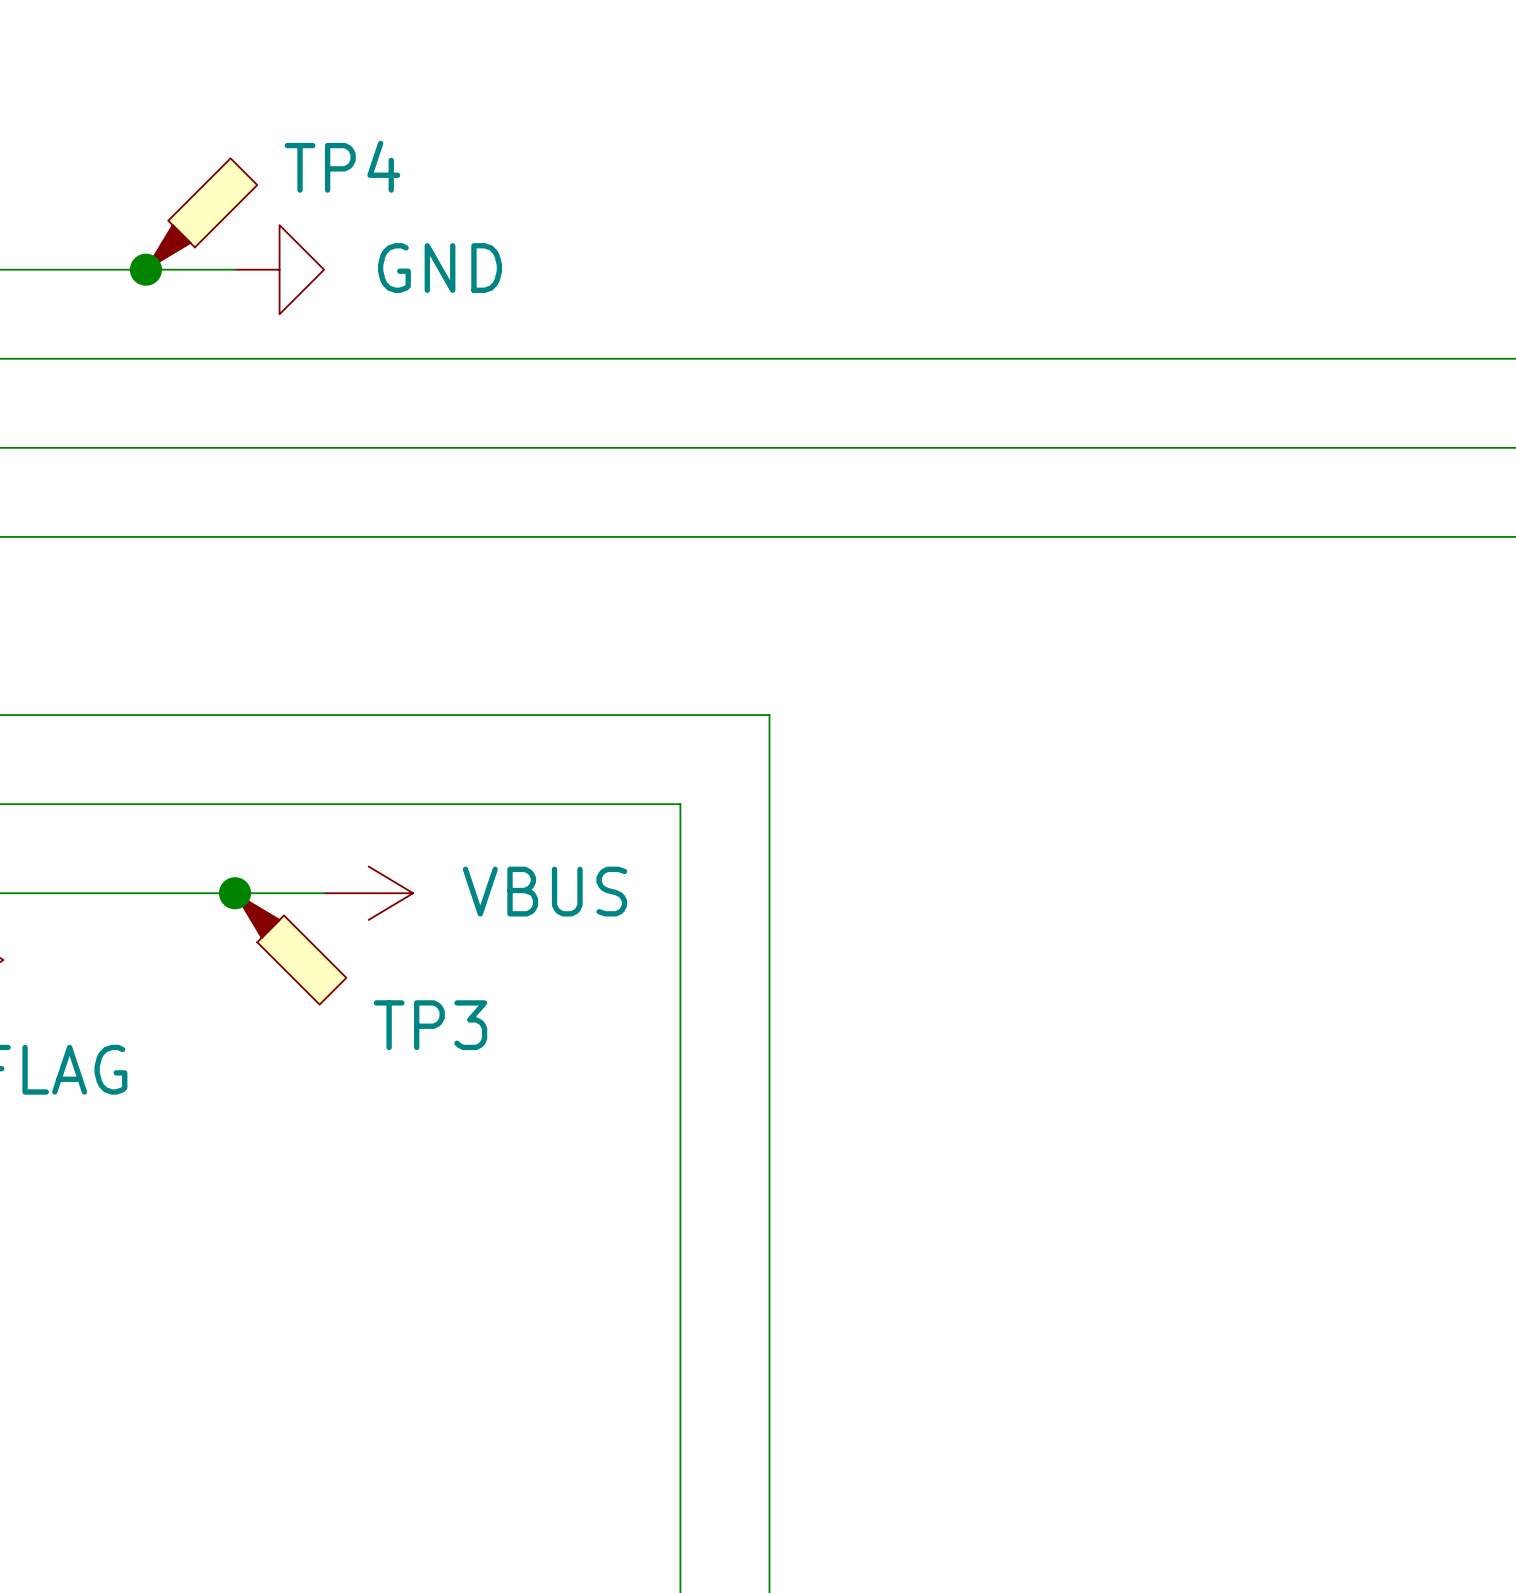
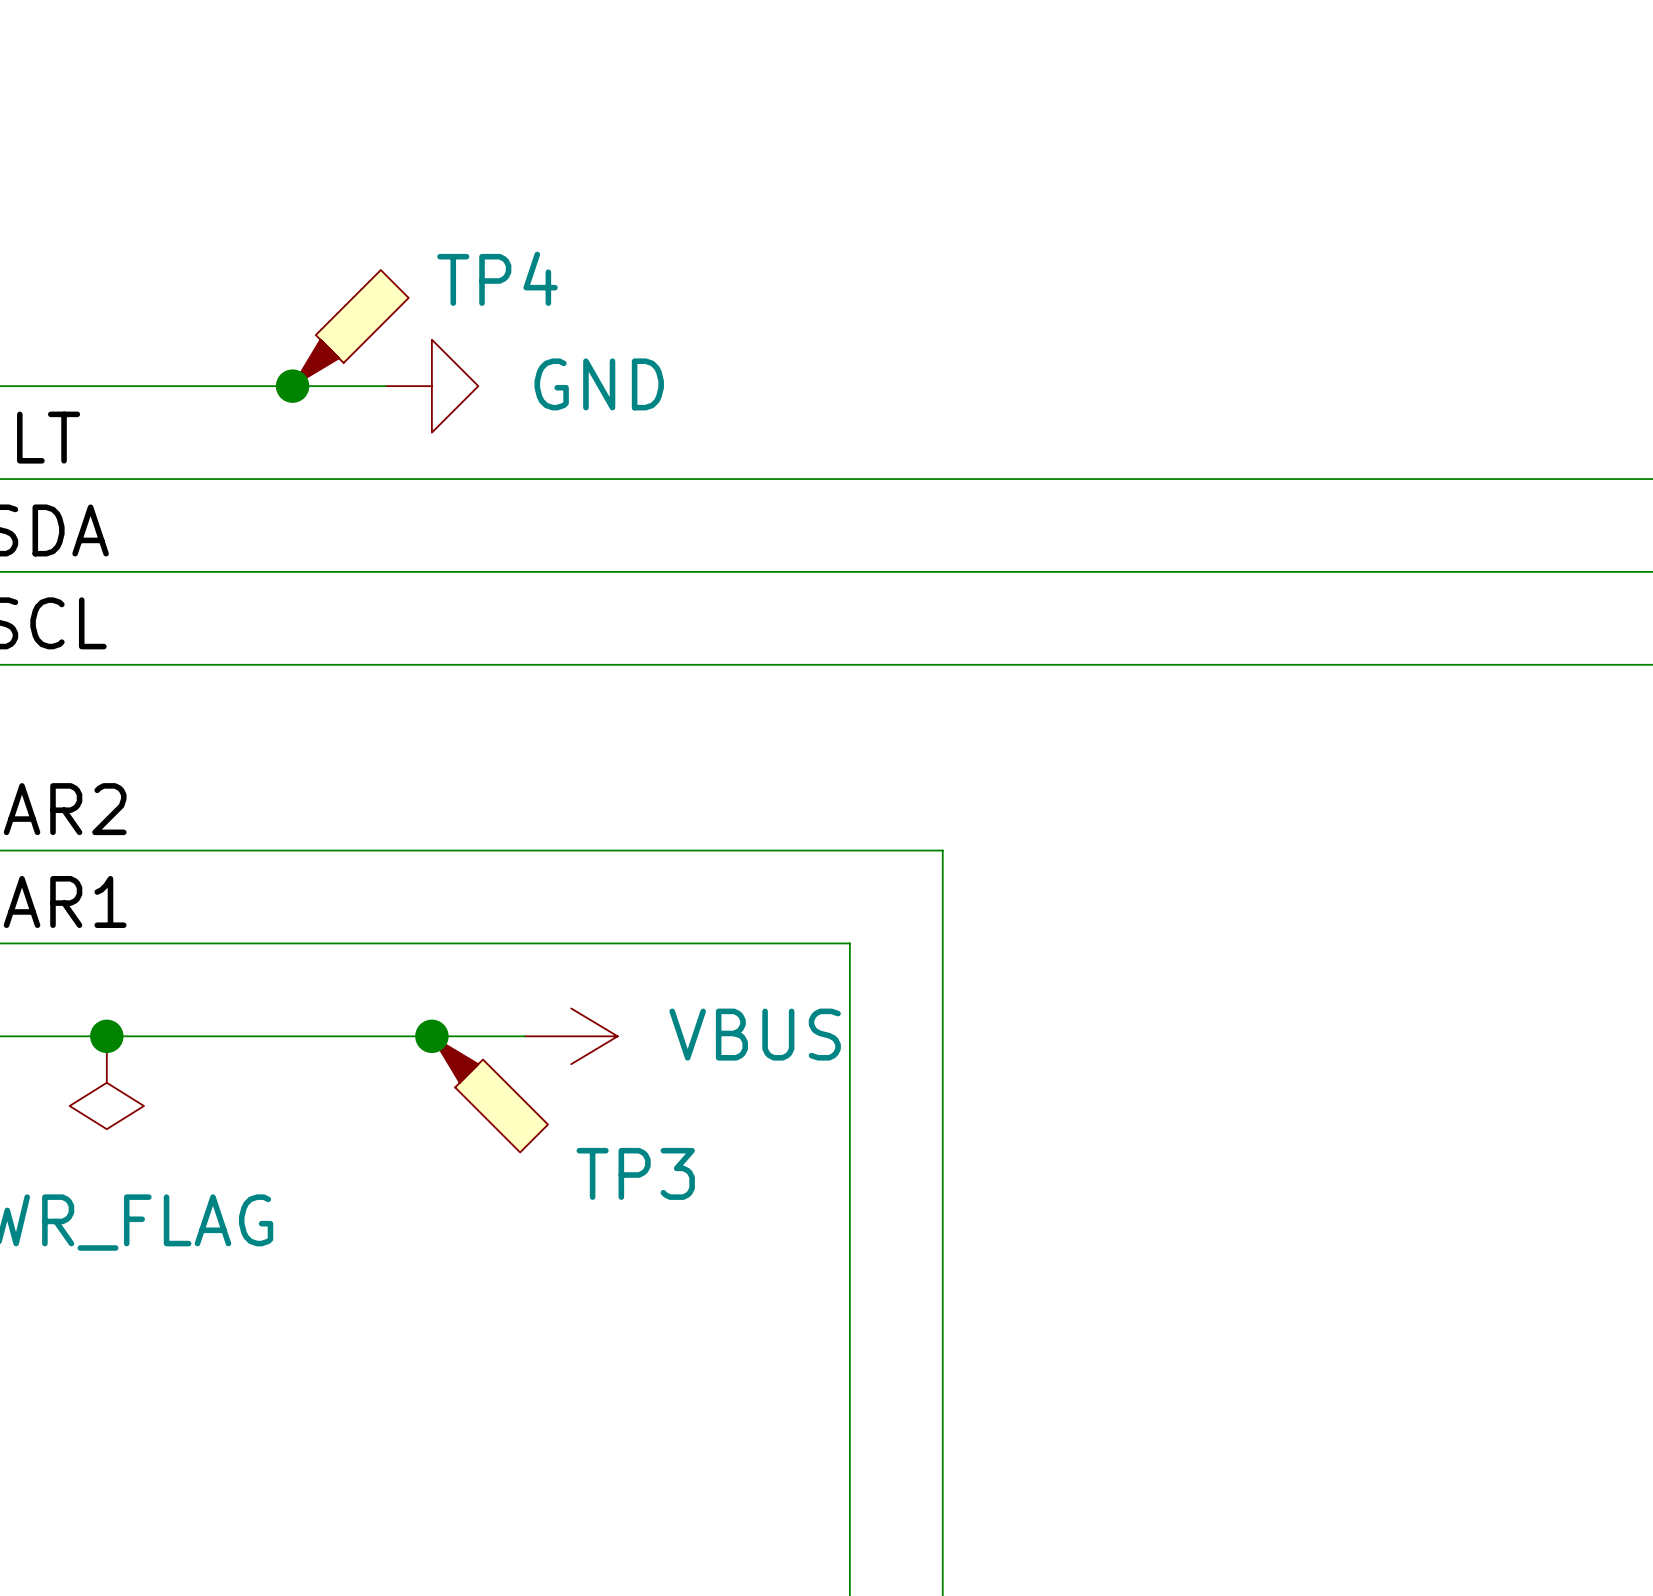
junction position: (235, 893) -> (431, 1036)
power symbol position: VBUS (368, 893) -> VBUS (571, 1036)
TP3 position: (290, 948) -> (489, 1094)

